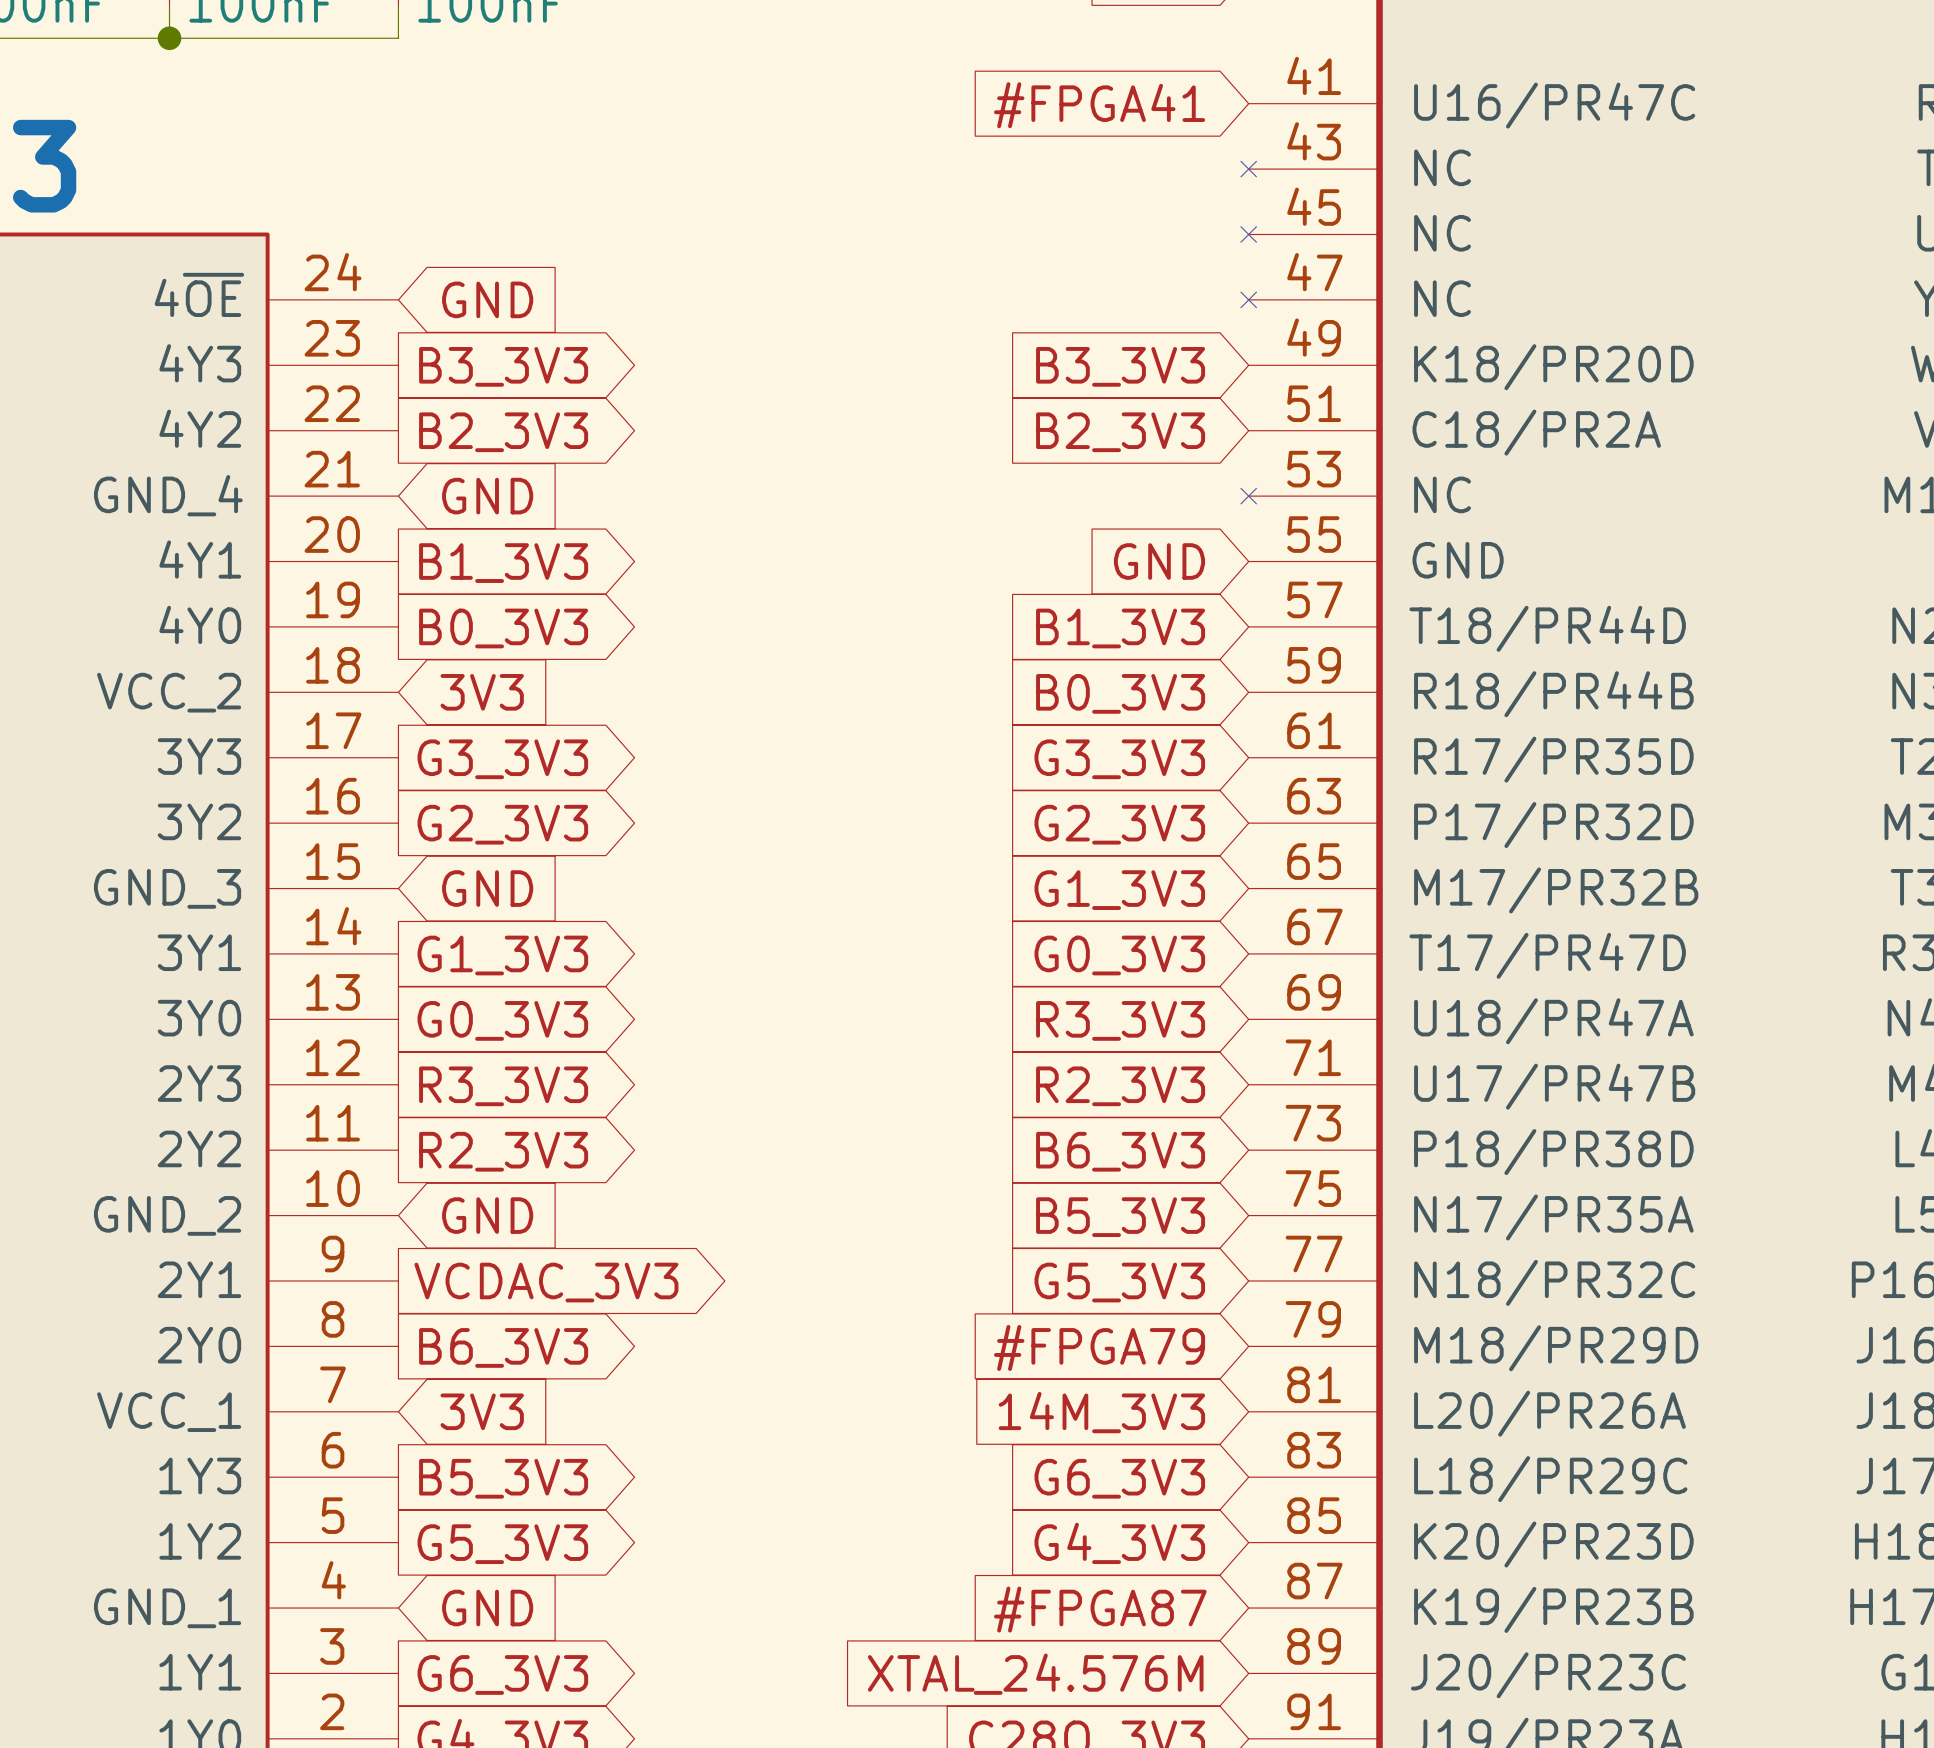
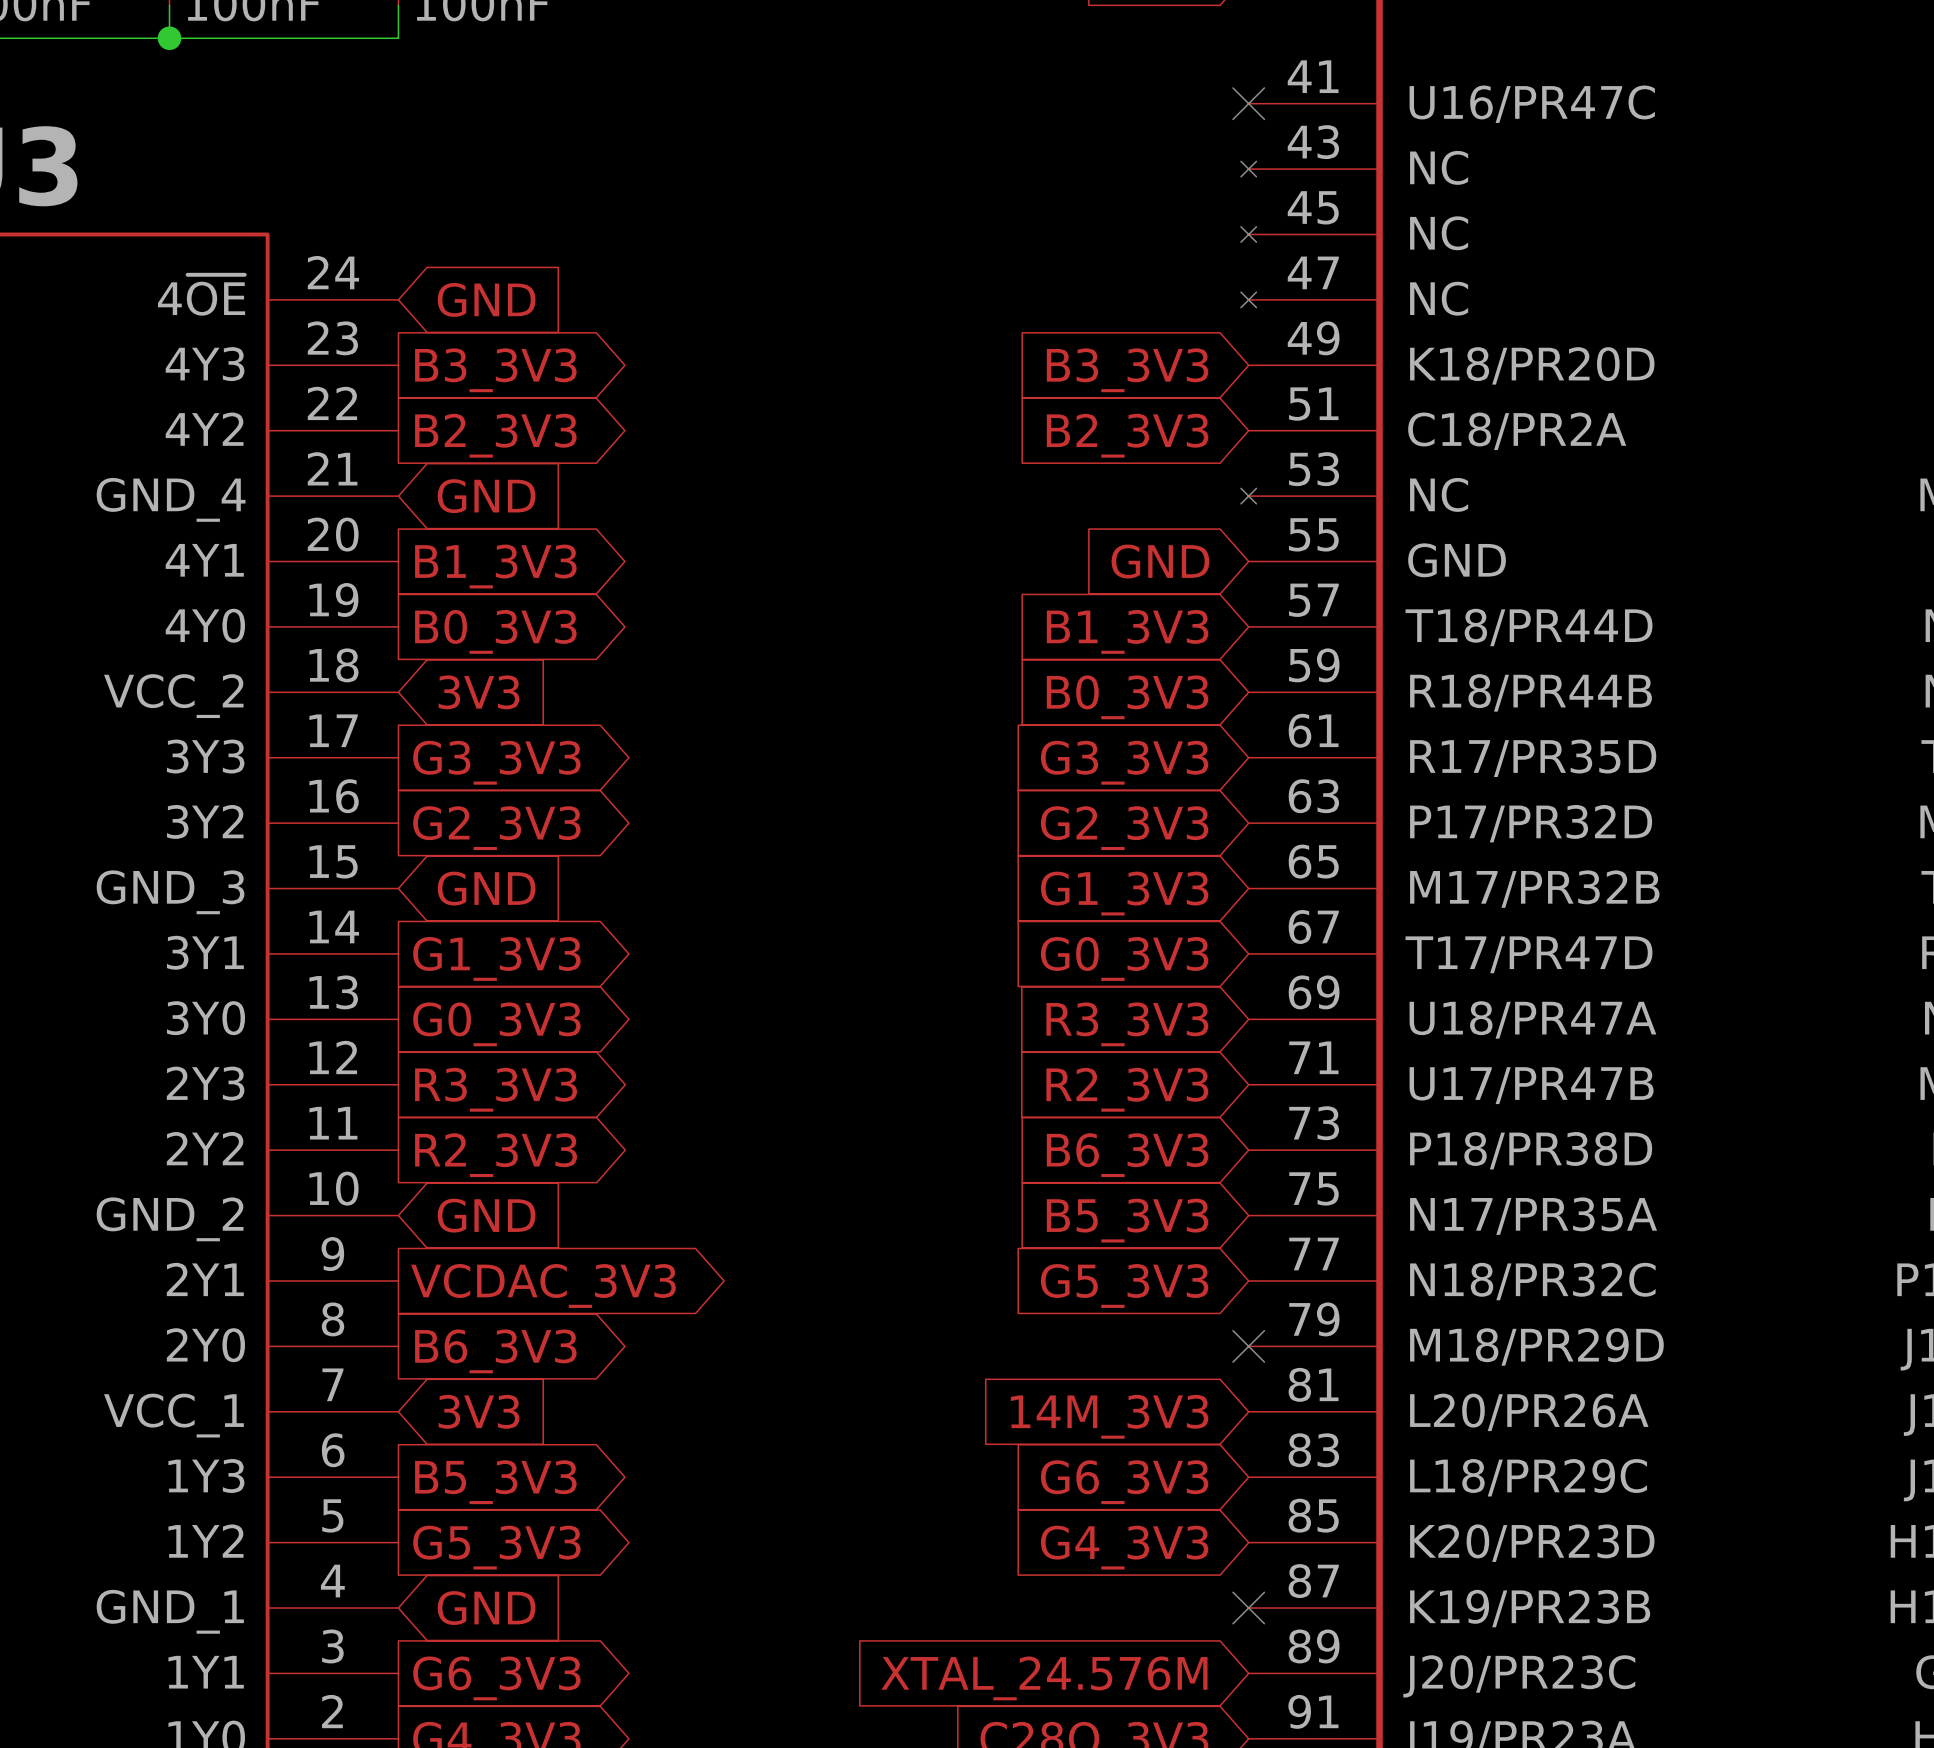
no-connect mark: none -> (1248, 103)
global label: #FPGA41 (1099, 105) -> none
no-connect mark: none -> (1248, 1346)
global label: #FPGA79 (1099, 1347) -> none
no-connect mark: none -> (1248, 1608)
global label: #FPGA87 (1100, 1609) -> none

